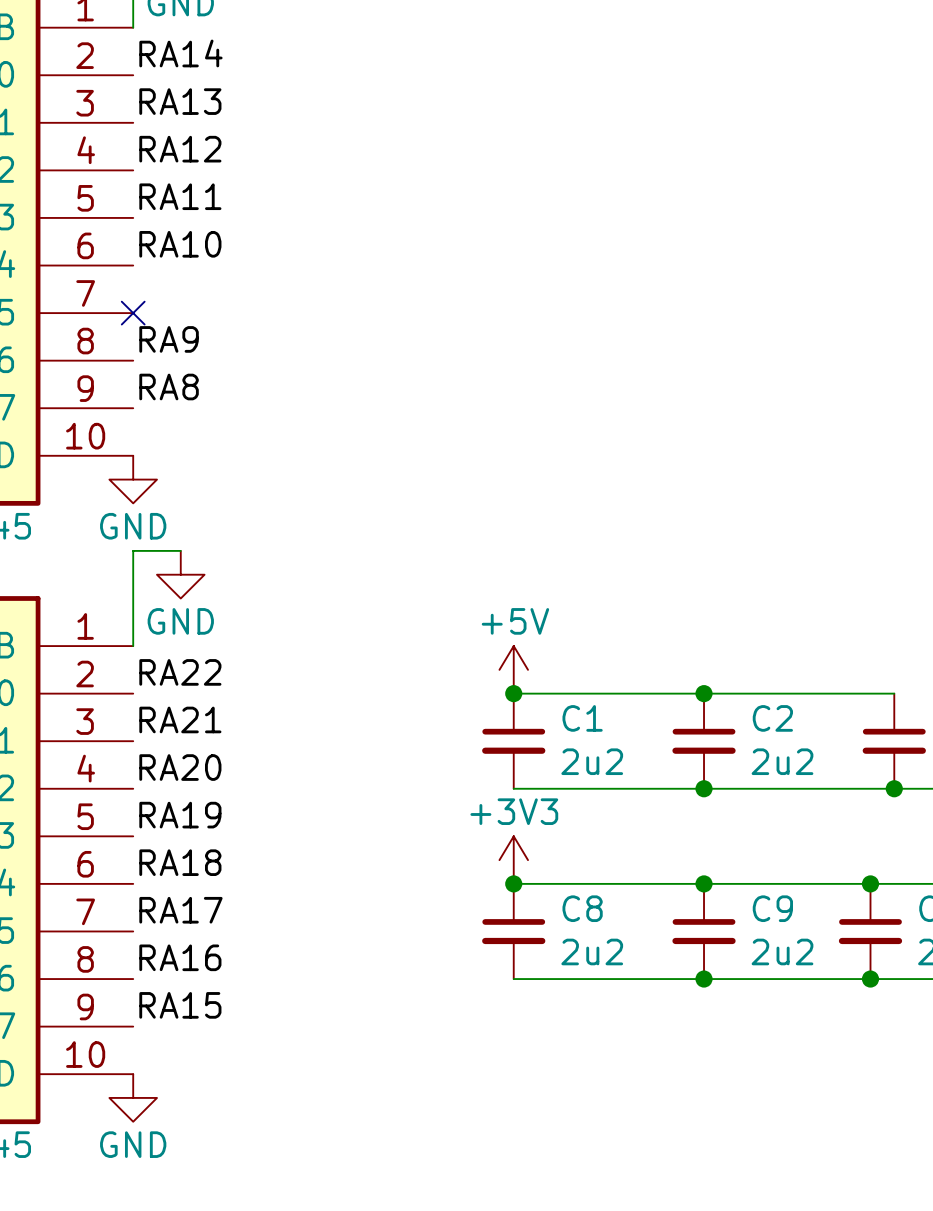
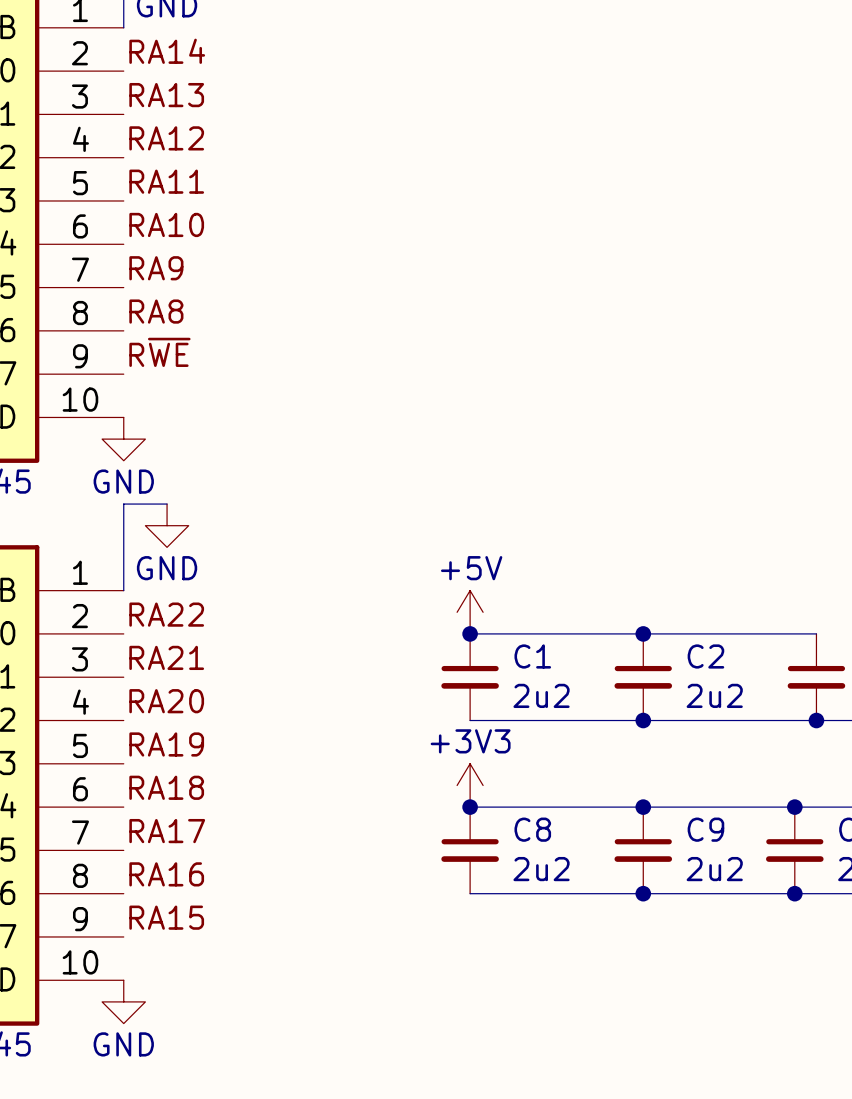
label: none -> RA9 (156, 268)
no-connect mark: (133, 313) -> none
label: RA9 (169, 339) -> RA8 (156, 311)
label: RA8 (169, 387) -> R~{WE} (159, 352)

